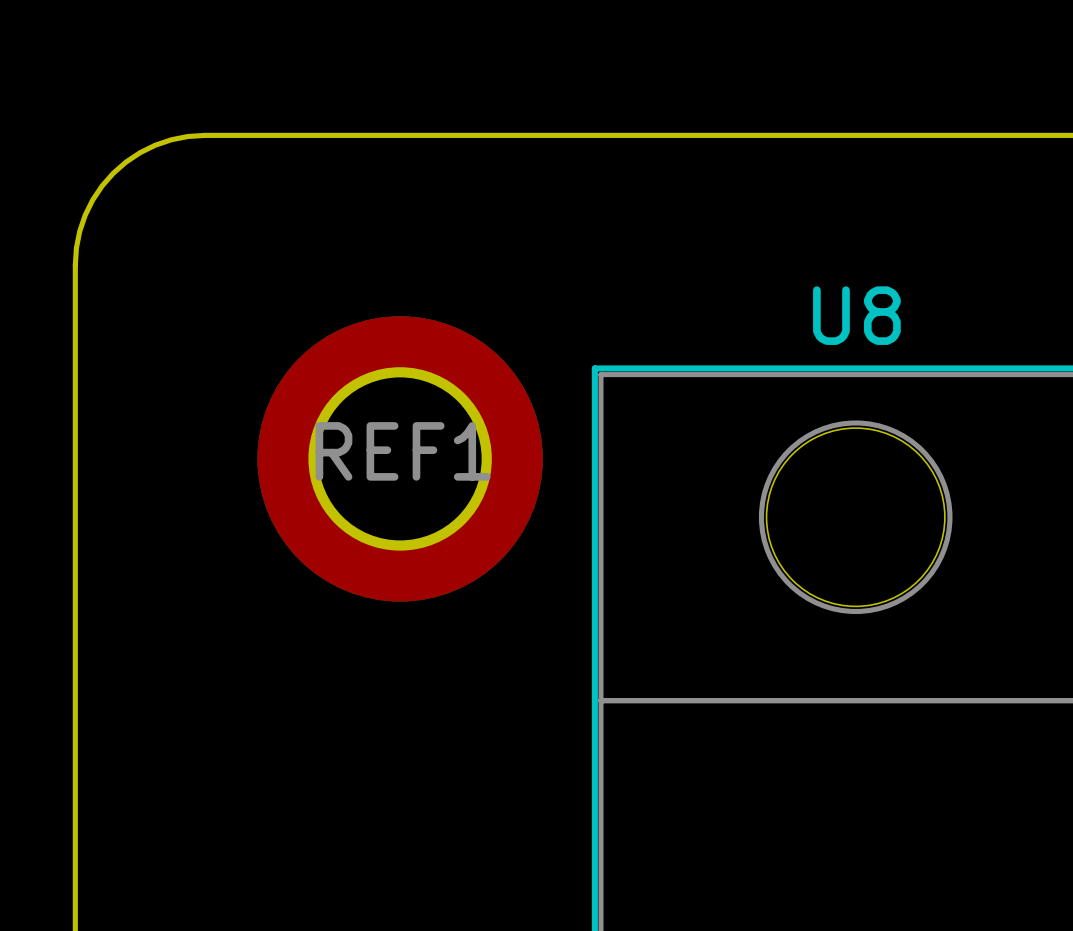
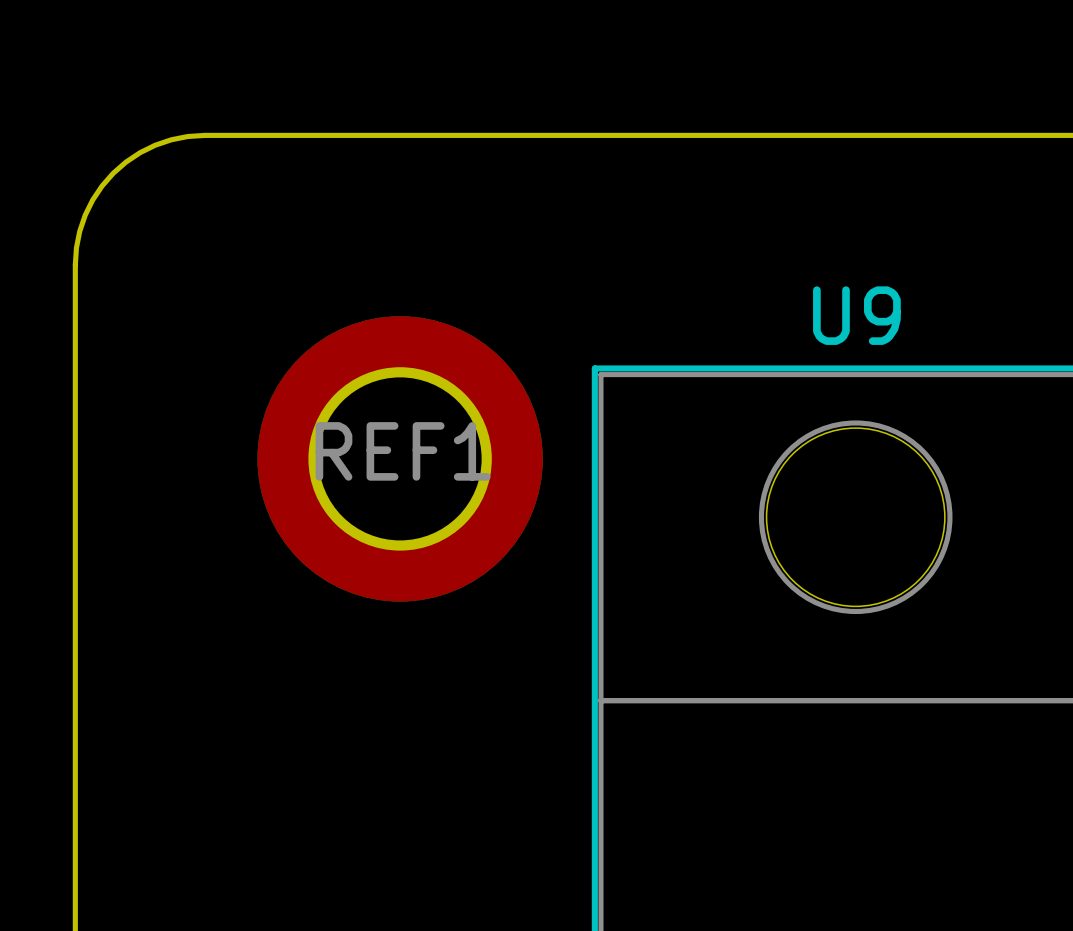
U8 name: U8 (856, 315) -> U9 (856, 315)

